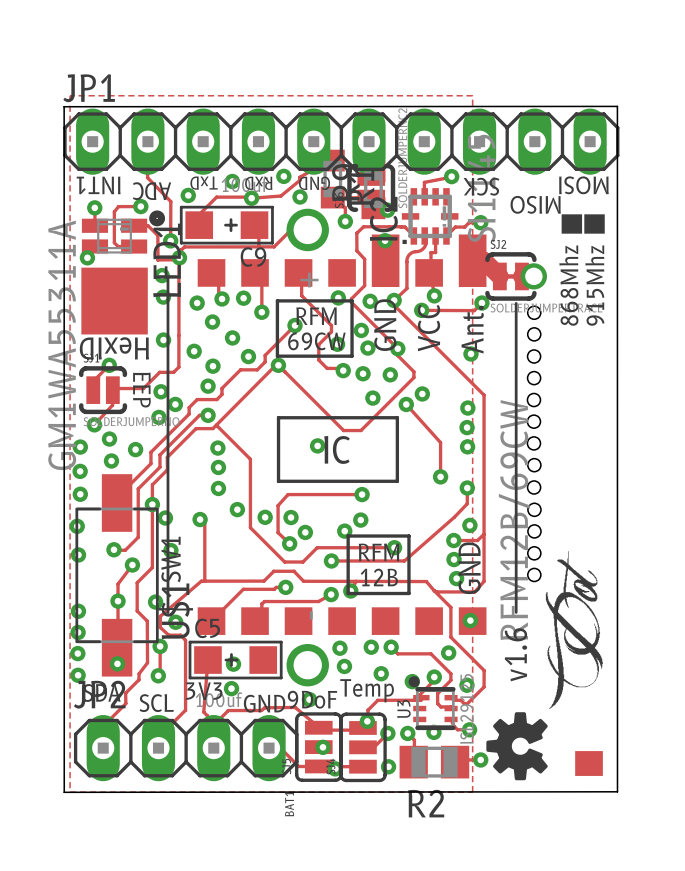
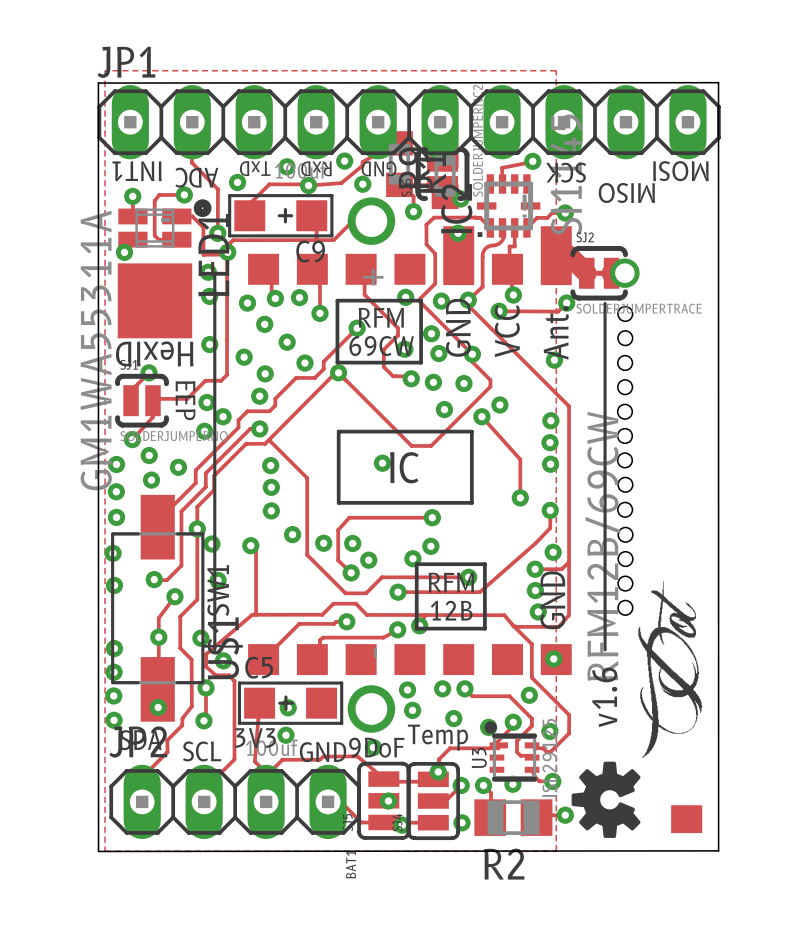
drawing: [561, 214, 605, 234] -> none
text: 868Mhz (568, 285) -> none
text: 915Mhz (594, 285) -> none

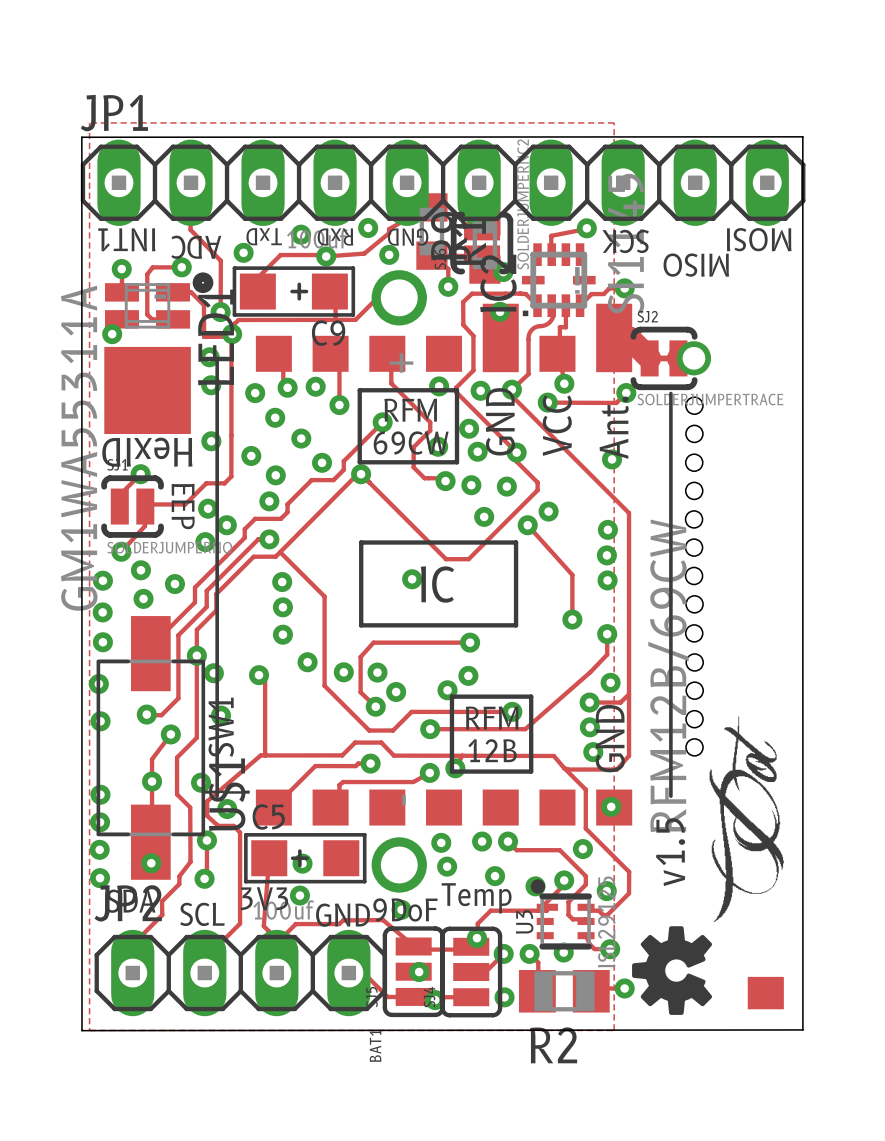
text: v1.6 (604, 697) -> v1.5 (670, 852)

